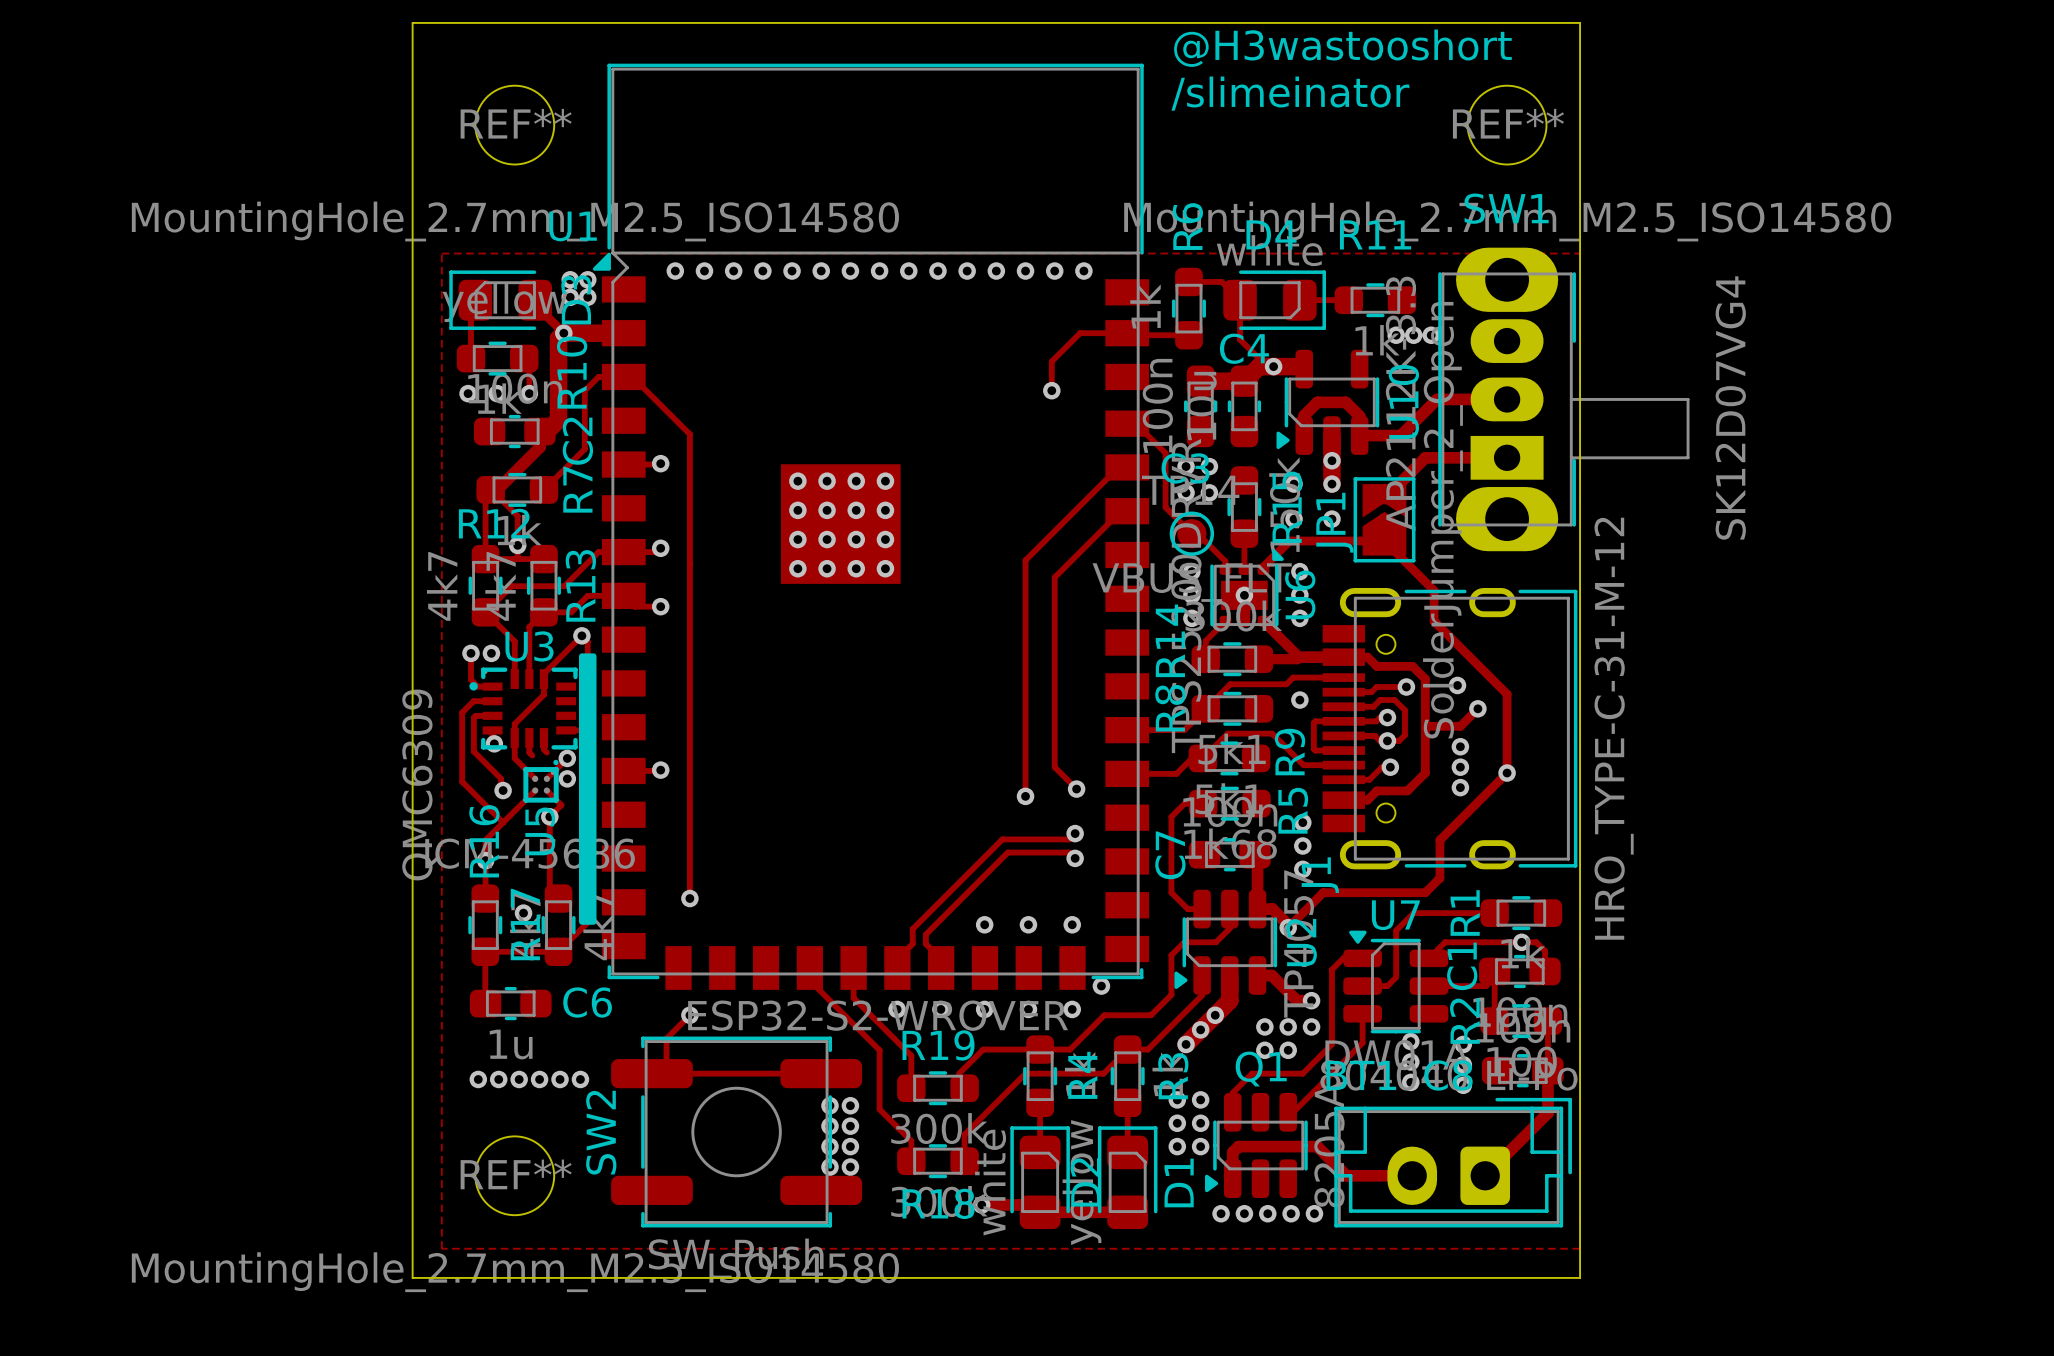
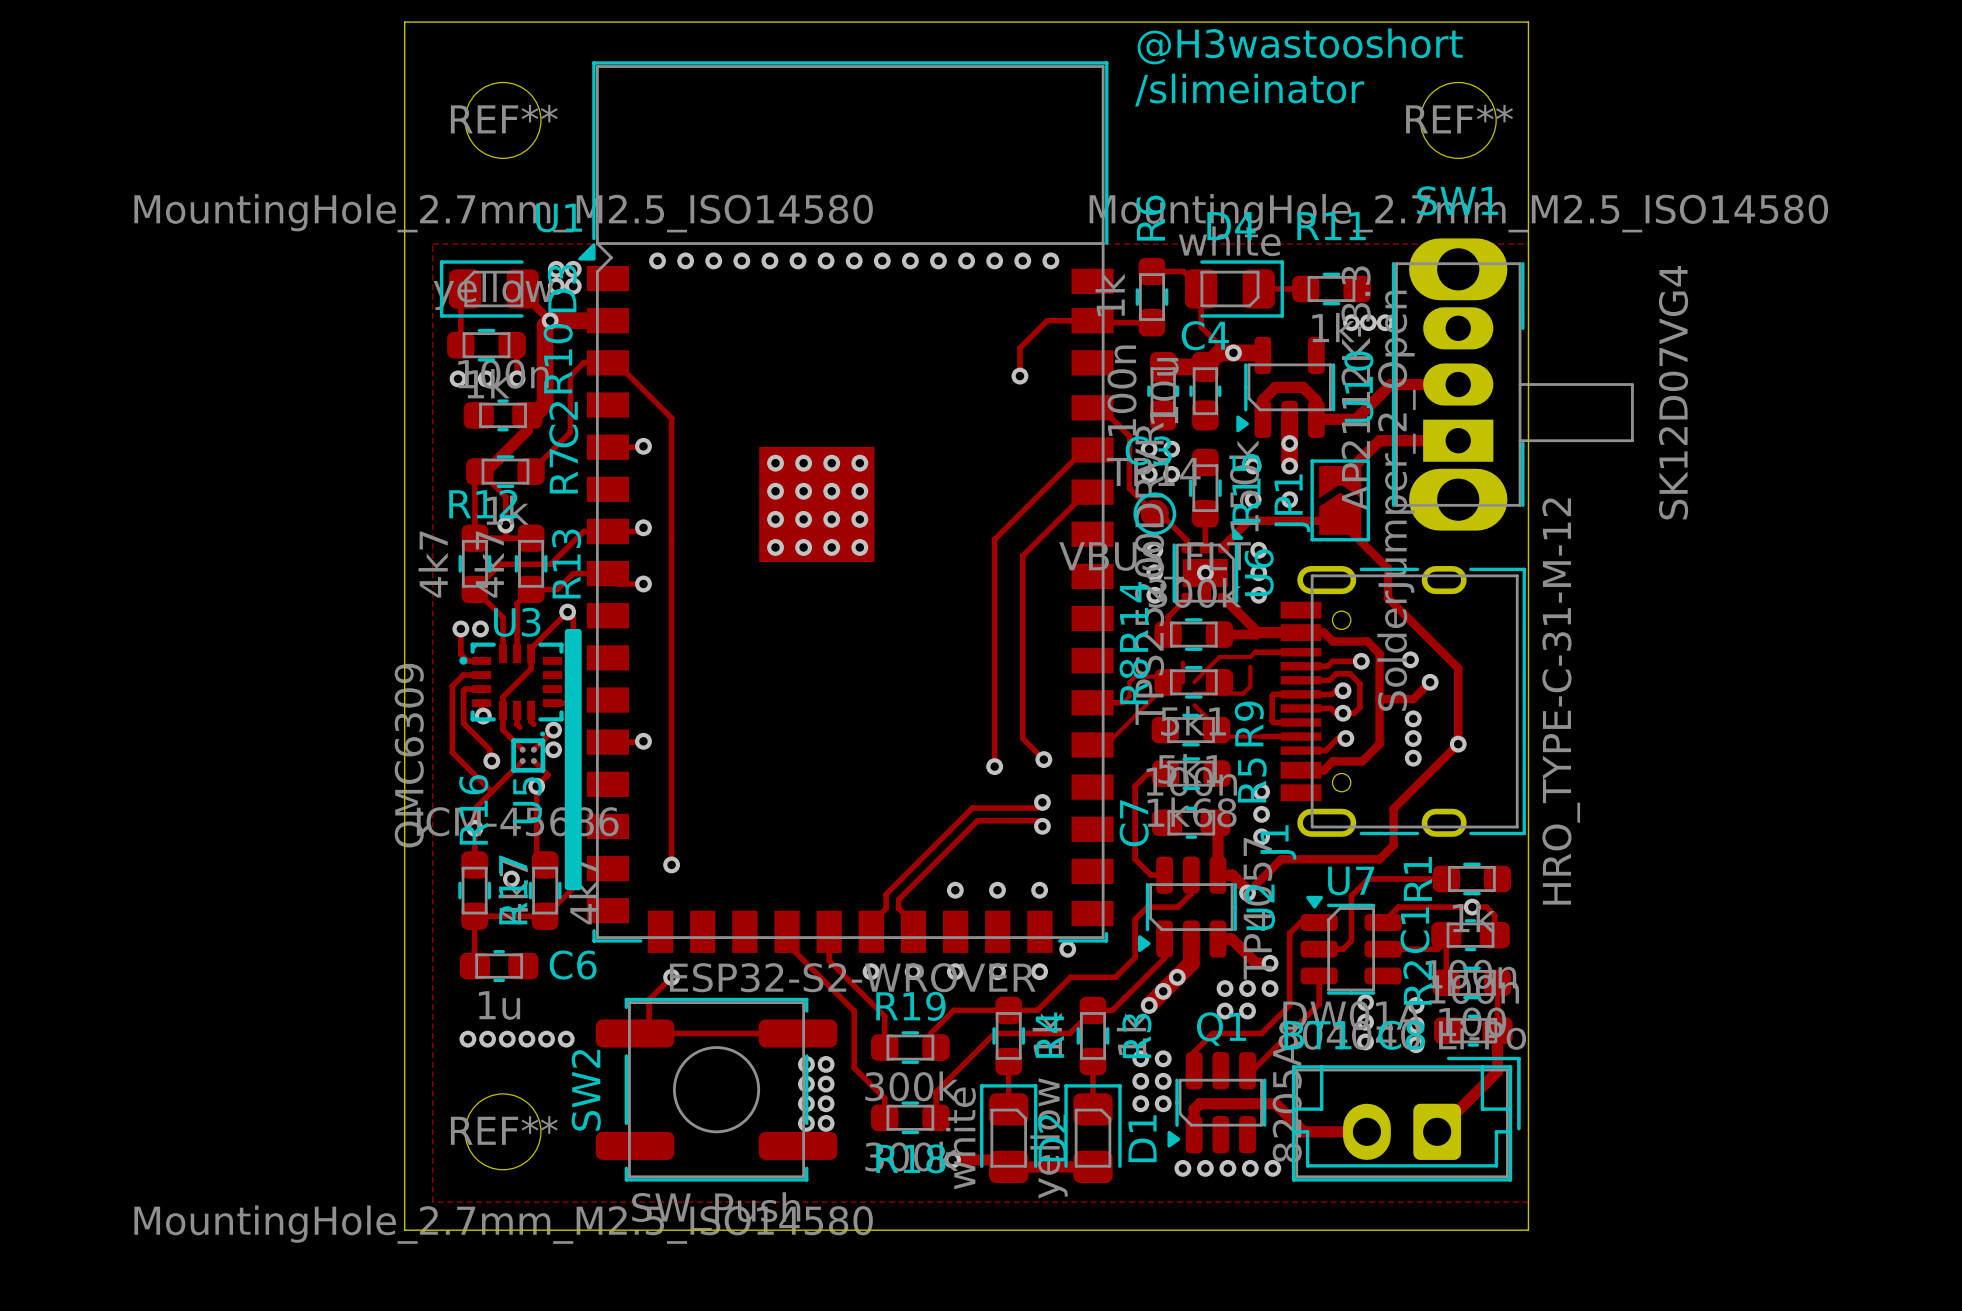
track: (1296, 677) (1293, 677) (1286, 684) (1230, 684) (1184, 730) (1158, 730) -> (1255, 652) (1250, 657) (1219, 657) (1194, 682)
track: none -> (1182, 662) (1182, 682)
track: none -> (1250, 666) (1250, 686) (1243, 693) (1194, 693)
via: (1299, 700) -> none
track: none -> (1171, 682) (1166, 676) (1135, 676) (1129, 682) (1129, 696) (1123, 702)
track: none -> (1171, 693) (1157, 693) (1106, 744)
track: (1303, 765) (1272, 733) (1227, 733) (1202, 758) (1191, 758) (1176, 773) (1141, 773) -> (1262, 736) (1225, 736) (1194, 705)

